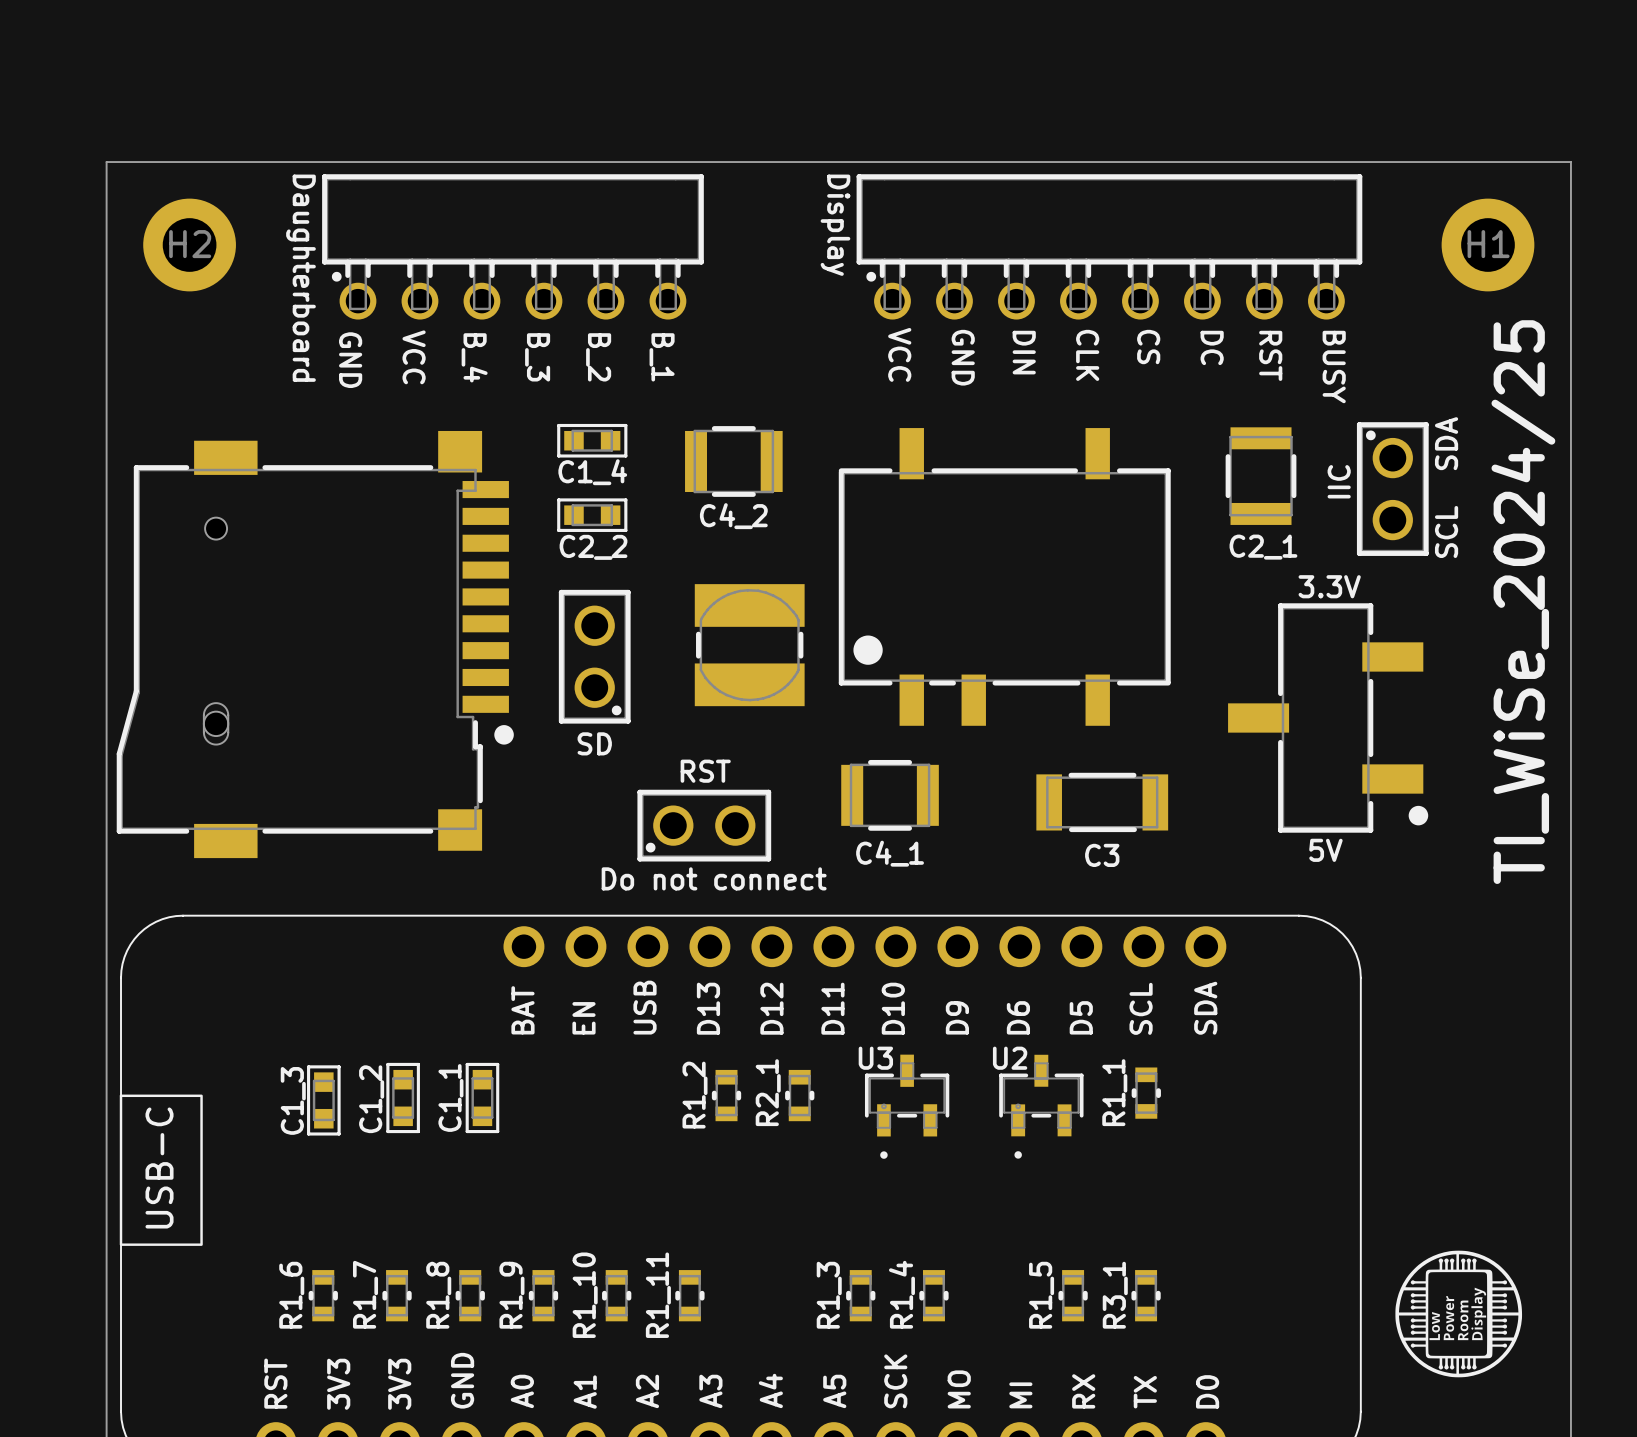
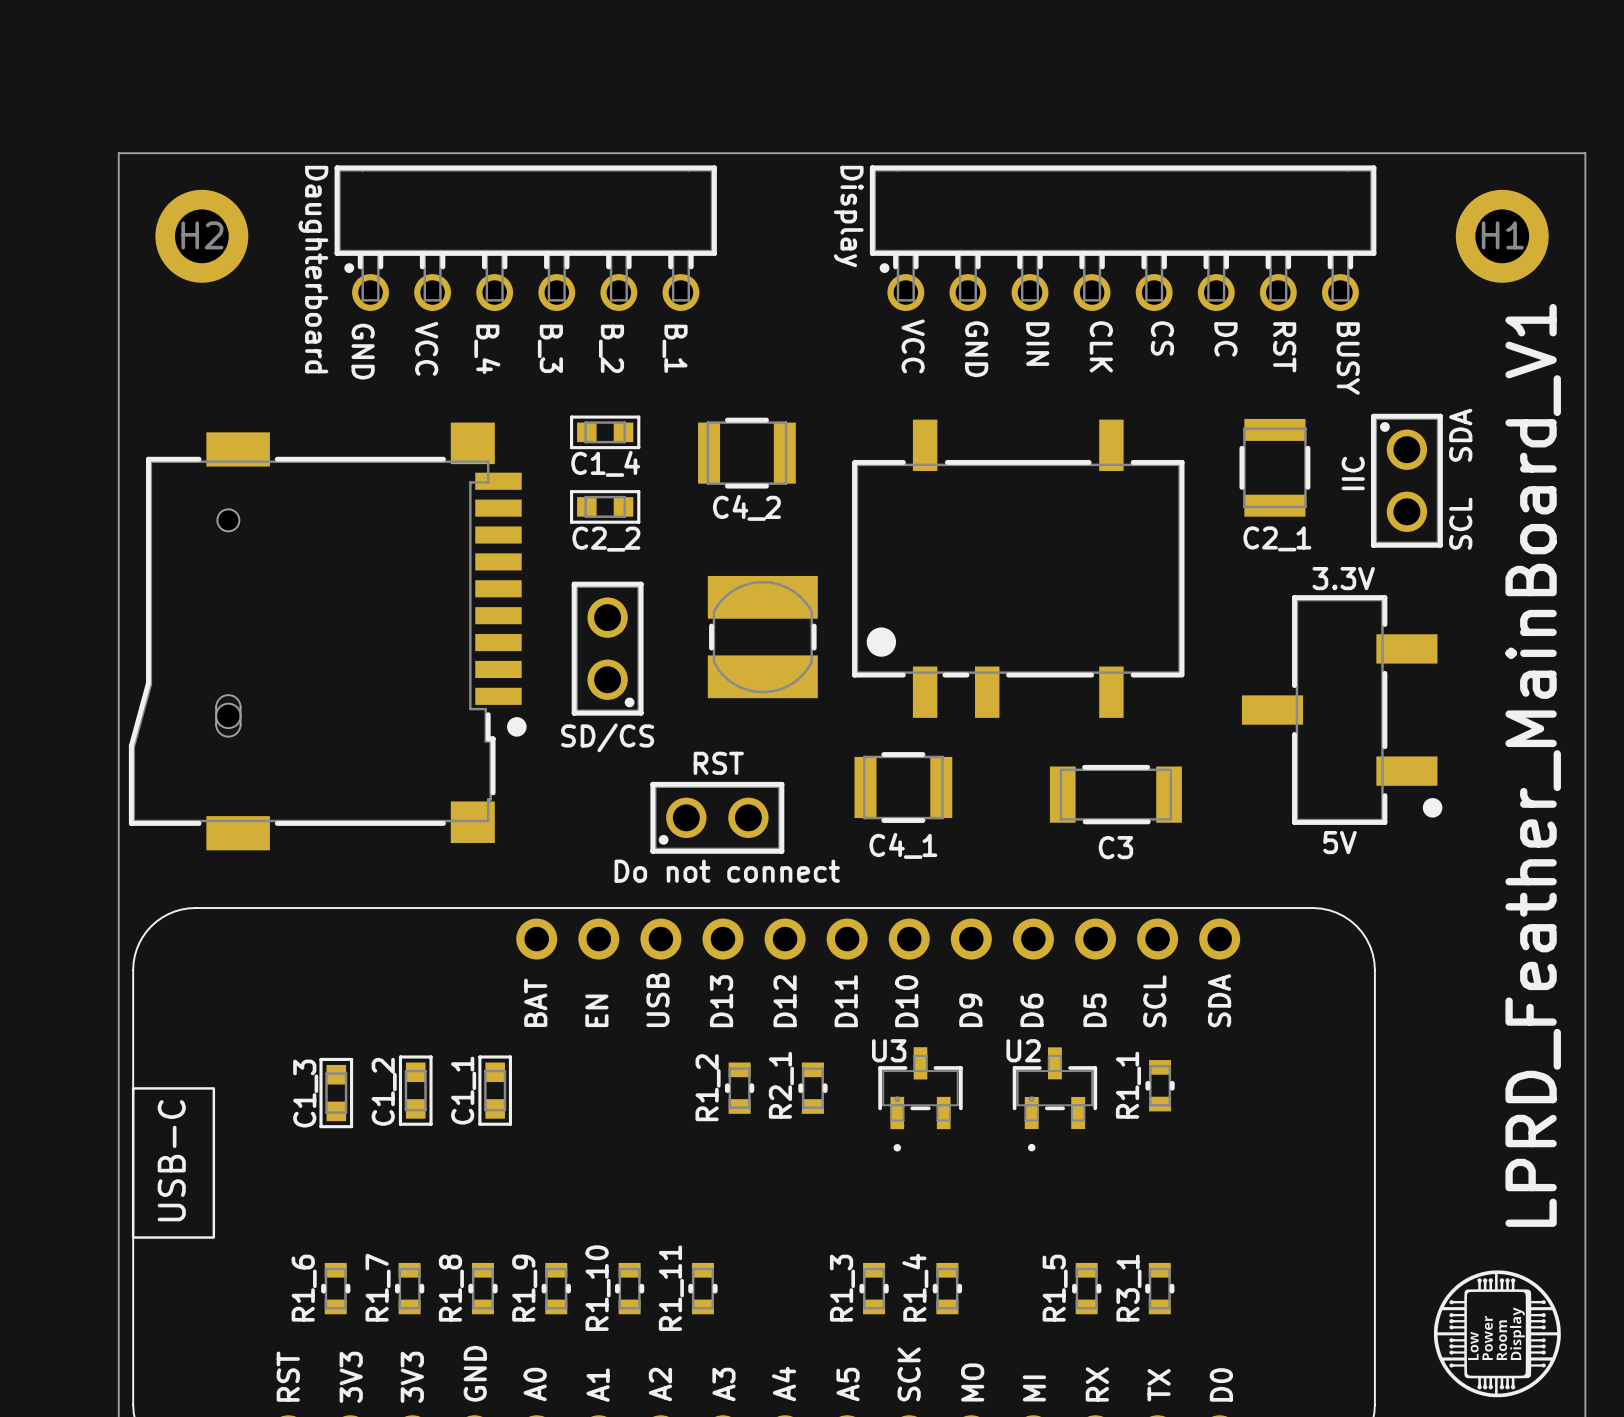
text: TI_WiSe_2024/25 (1523, 602) -> none
SD name: SD (594, 743) -> SD/CS (607, 737)
text: none -> LPRD_Feather_MainBoard_V1 (1533, 765)
drawing position: (1458, 1313) -> (1497, 1333)

